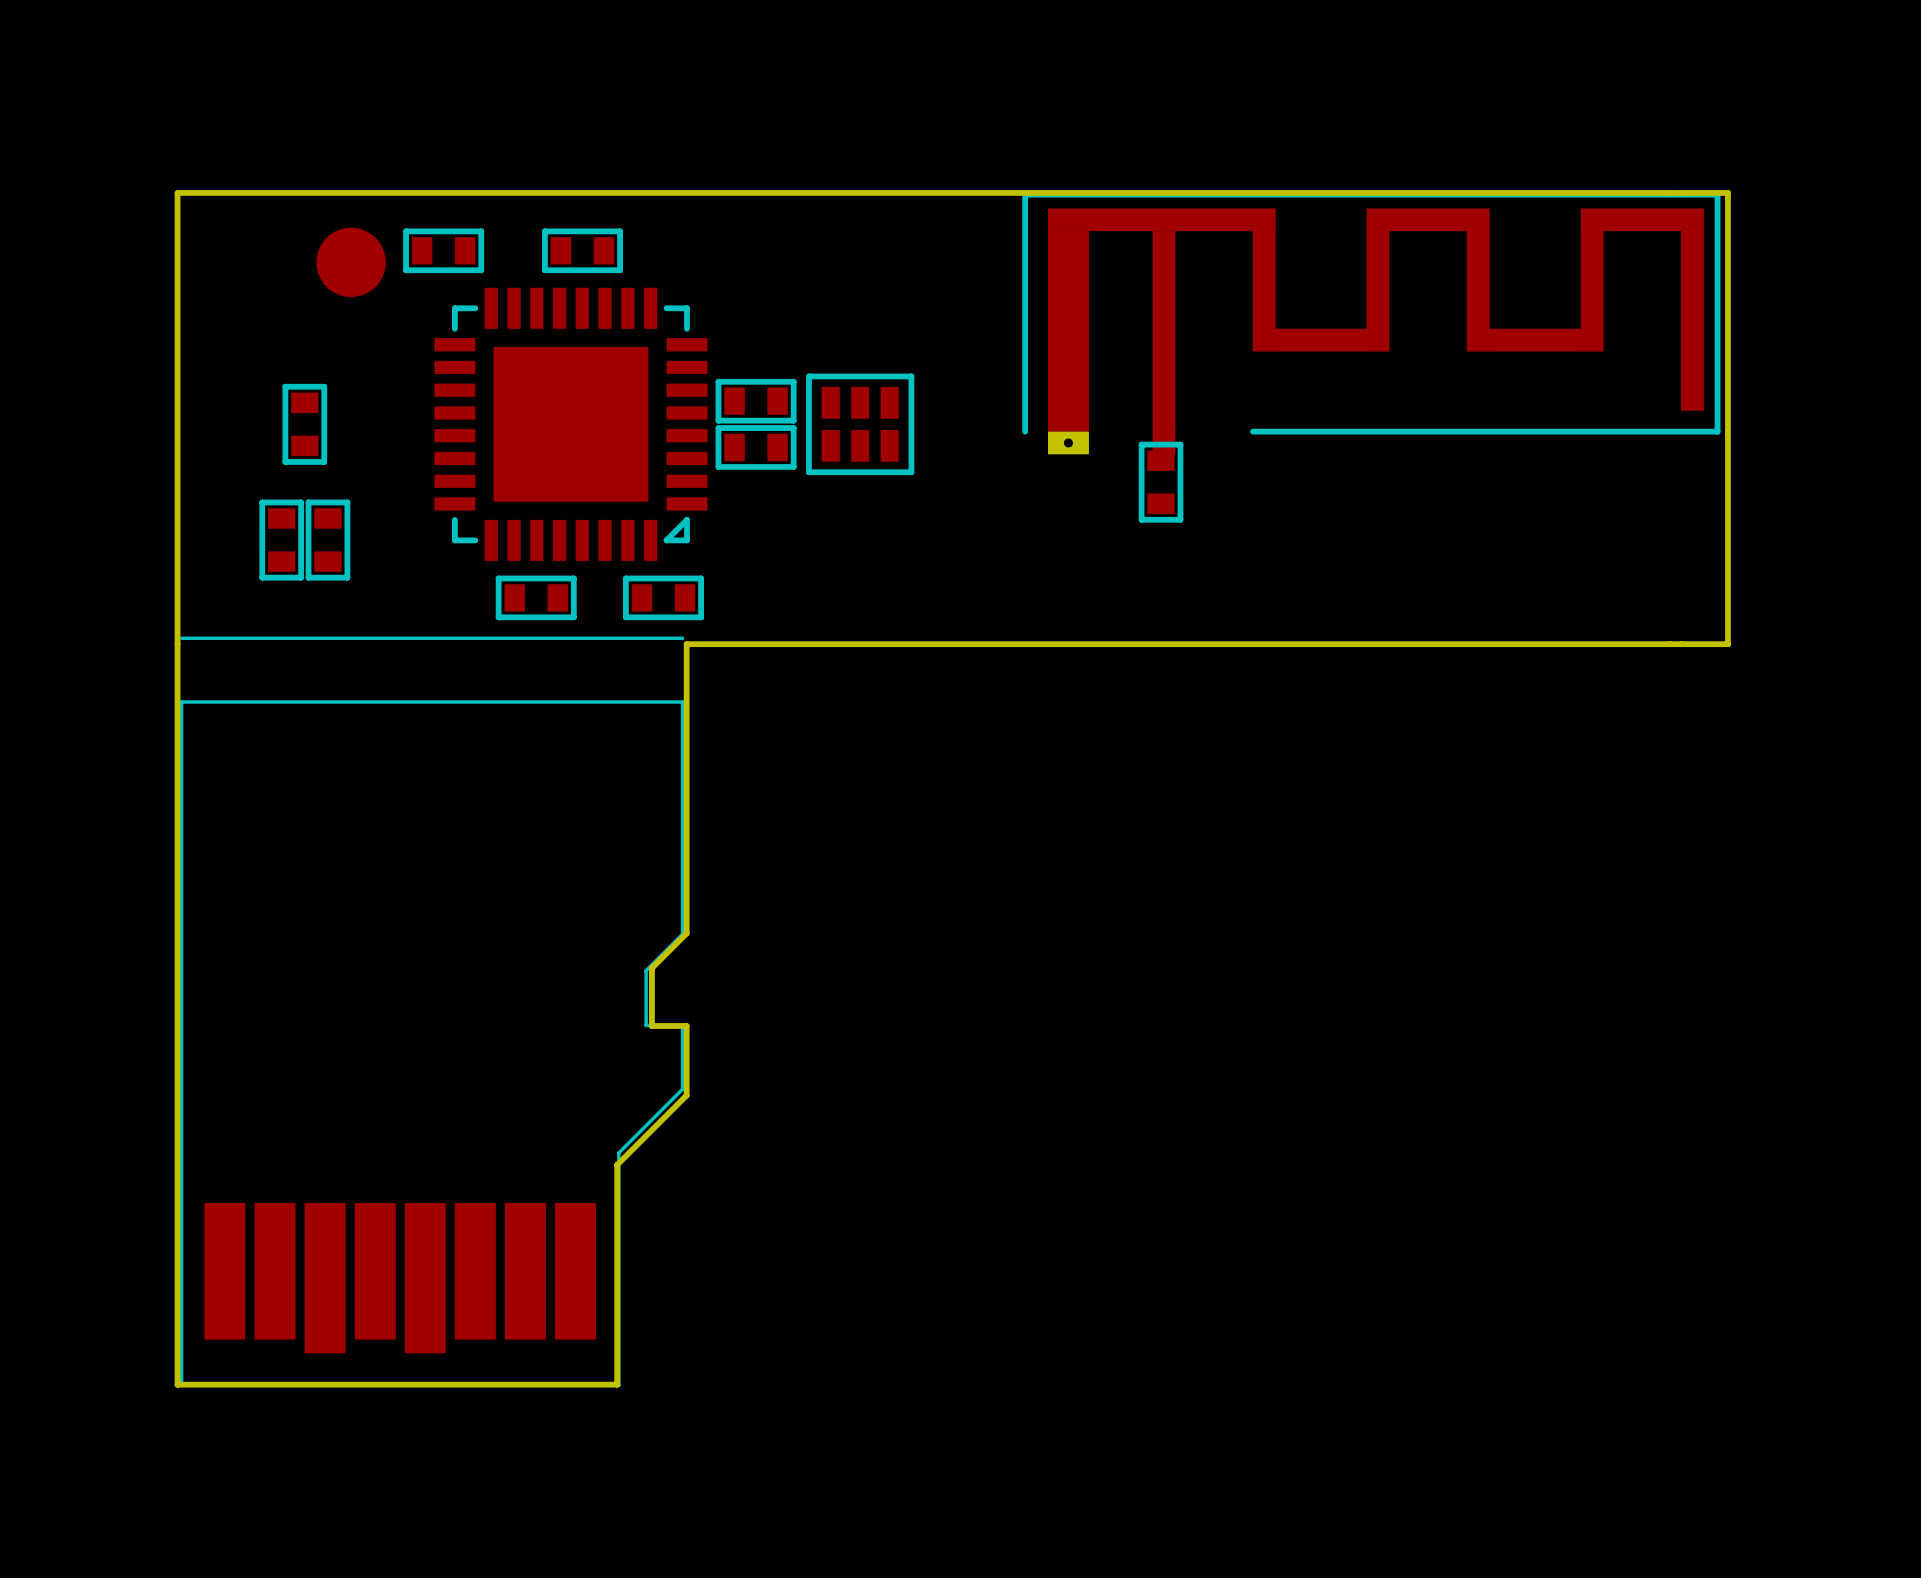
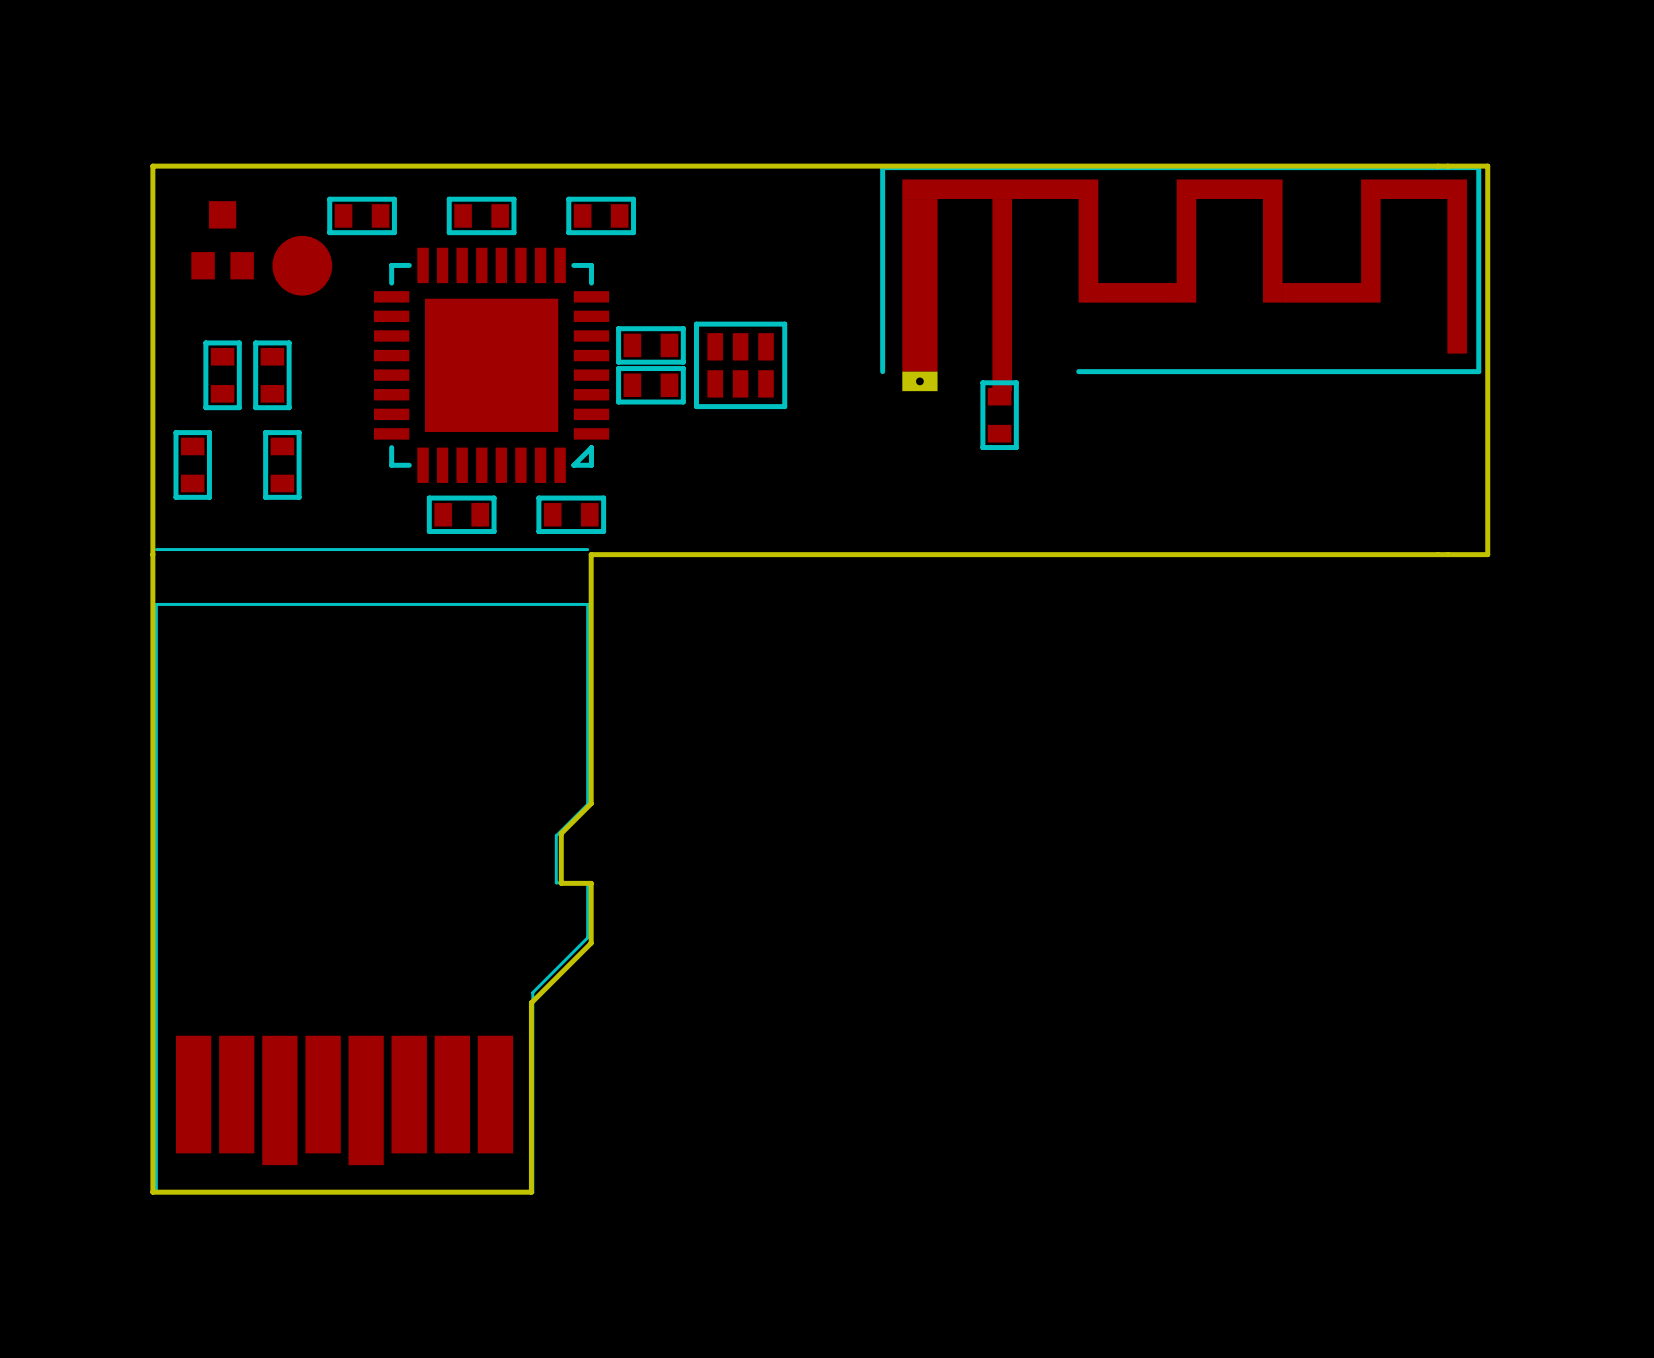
part position: (443, 250) -> (362, 215)
part position: (582, 250) -> (481, 215)
part: none -> (601, 215)
part position: (351, 262) -> (302, 265)
part: none -> (222, 240)
part position: (304, 424) -> (272, 375)
part: none -> (222, 375)
part: none -> (192, 464)
part: (281, 540) -> none

